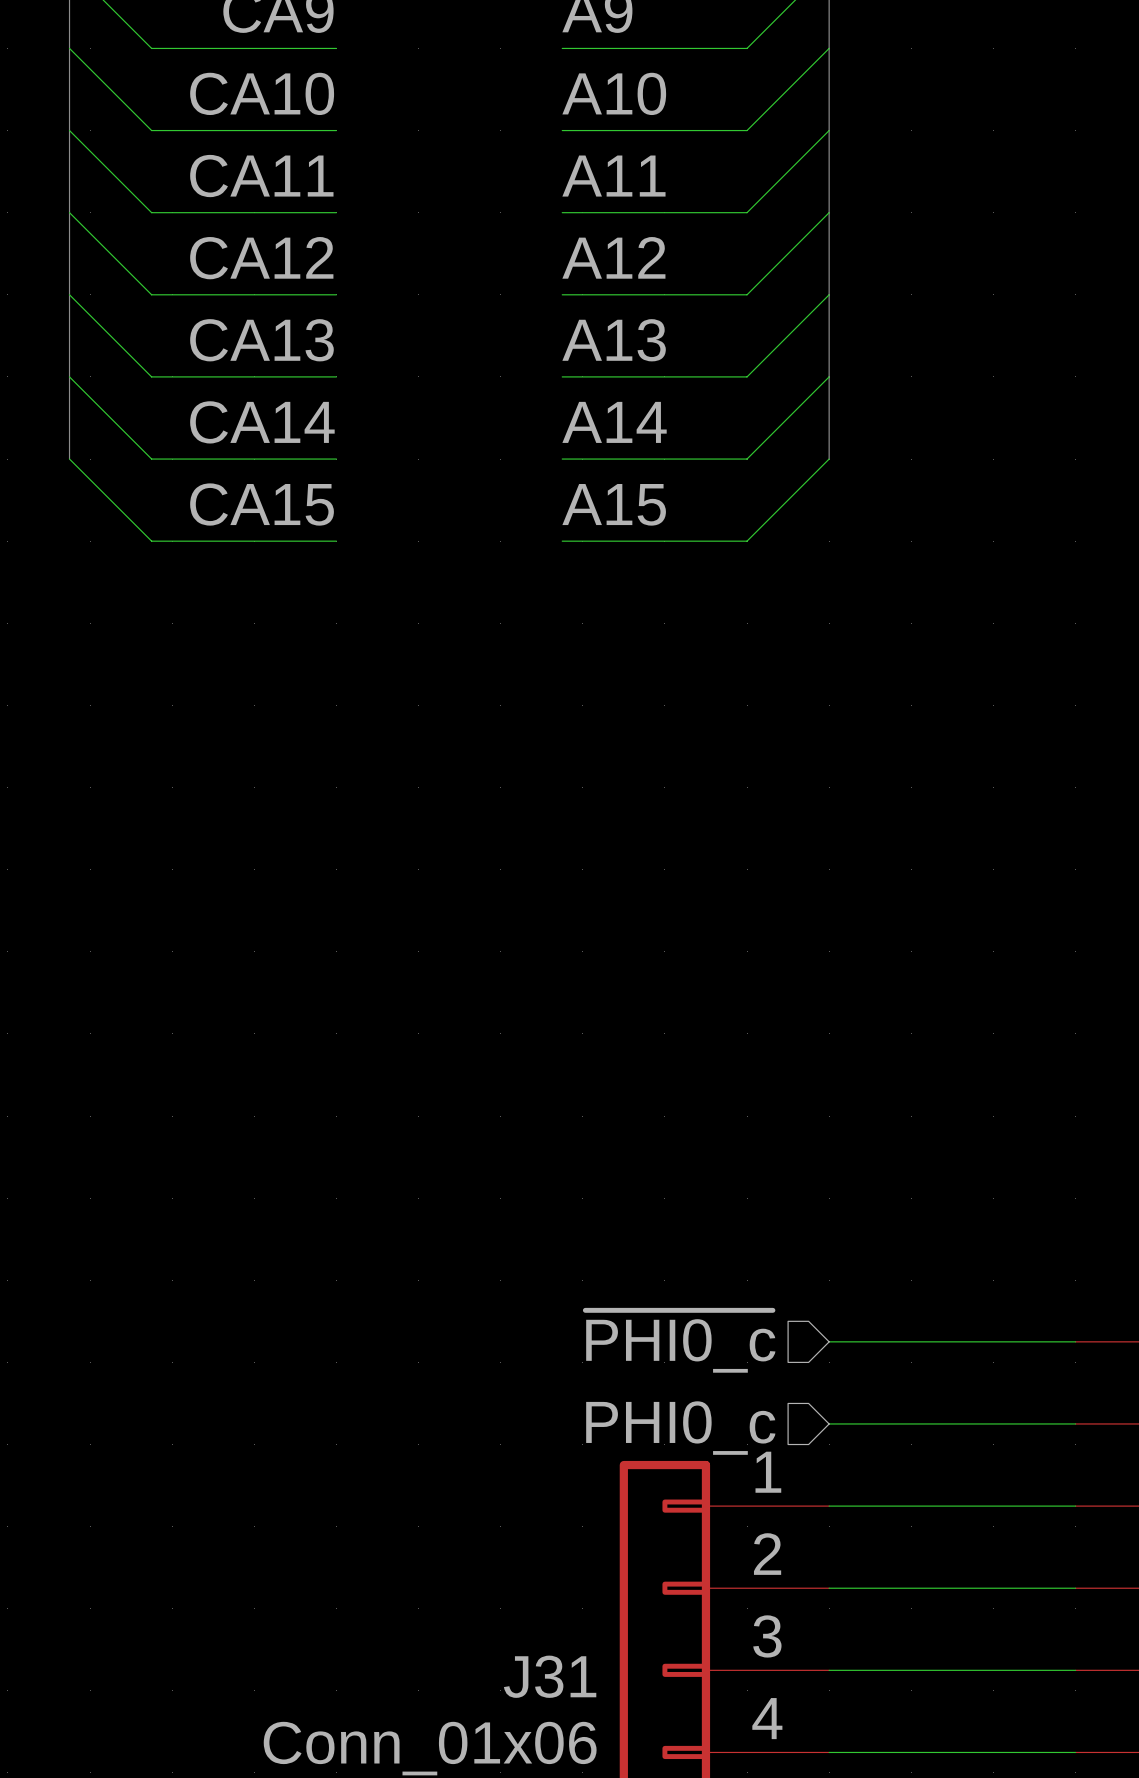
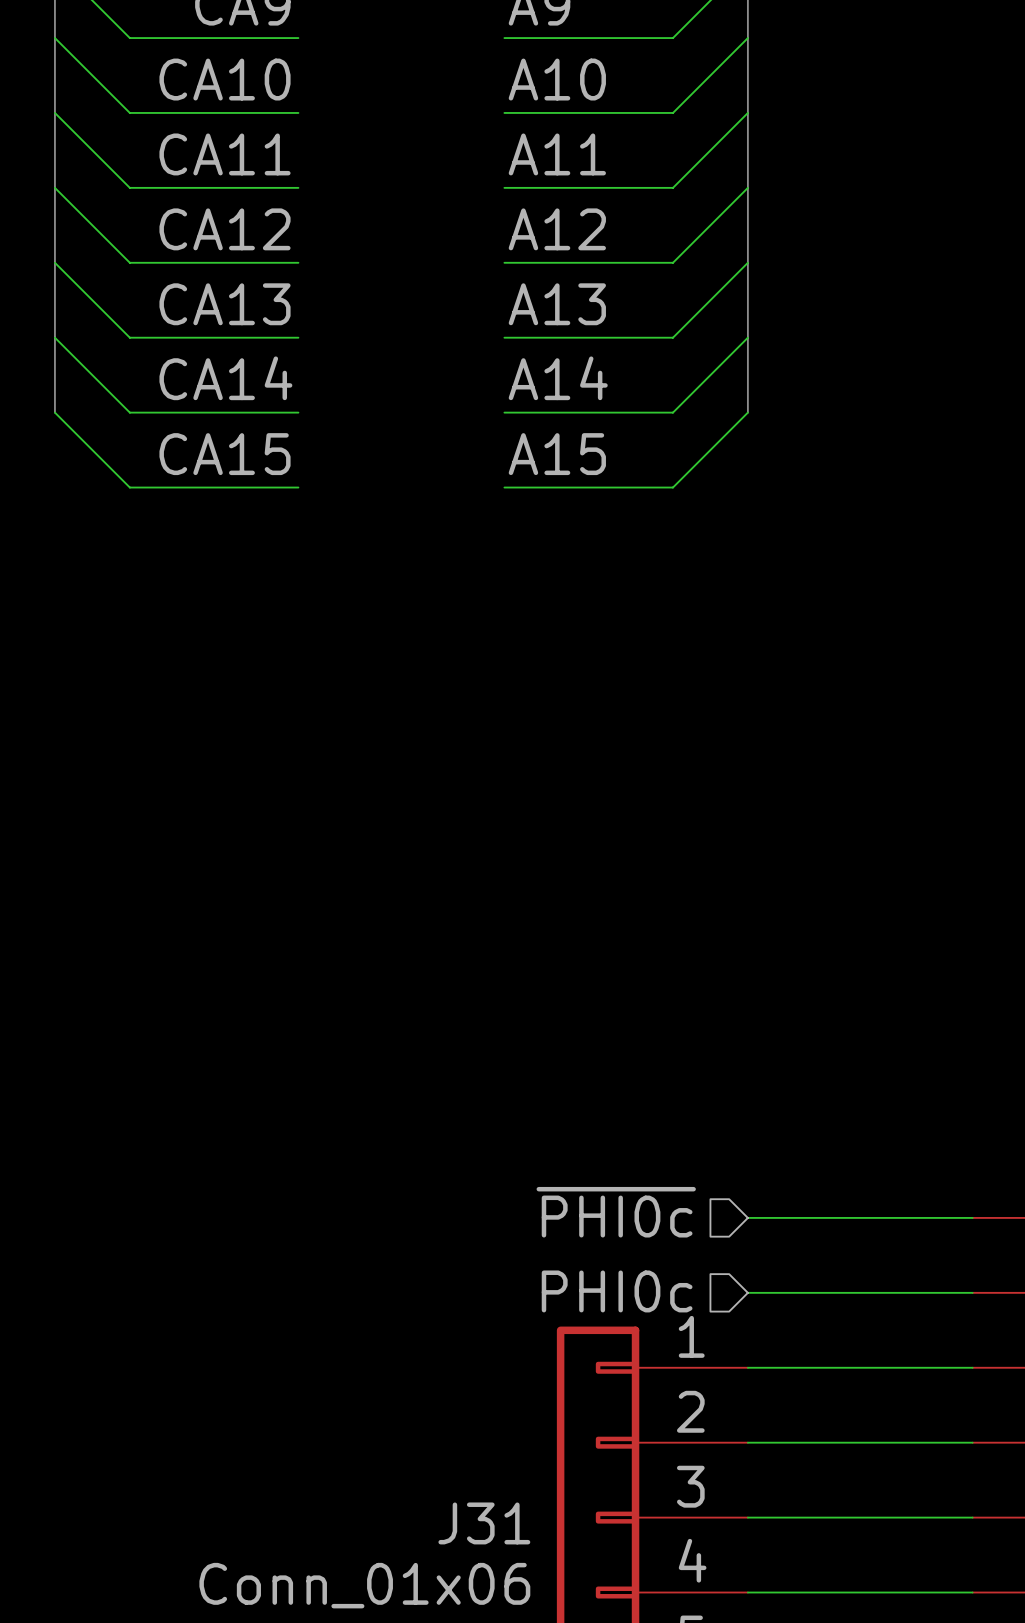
hierarchical label: ~{PHI0_c} (680, 1341) -> ~{PHI0c} (616, 1212)
hierarchical label: PHI0_c (680, 1428) -> PHI0c (617, 1291)

